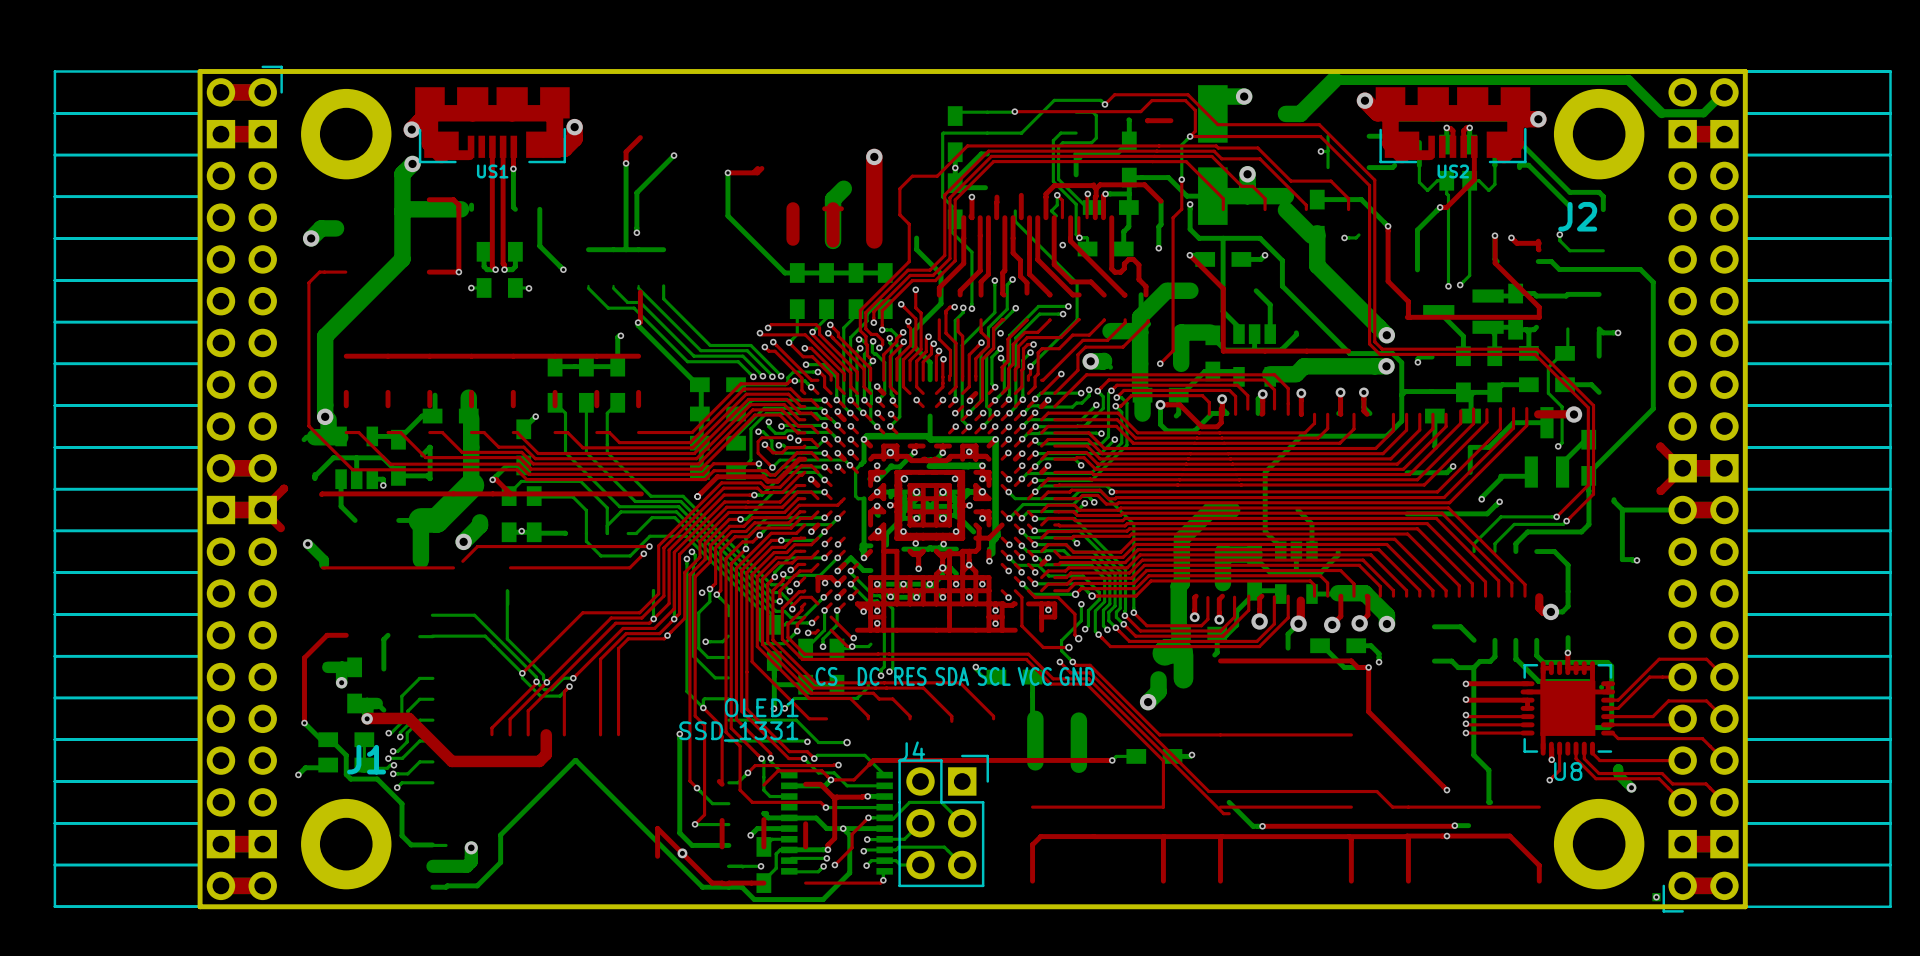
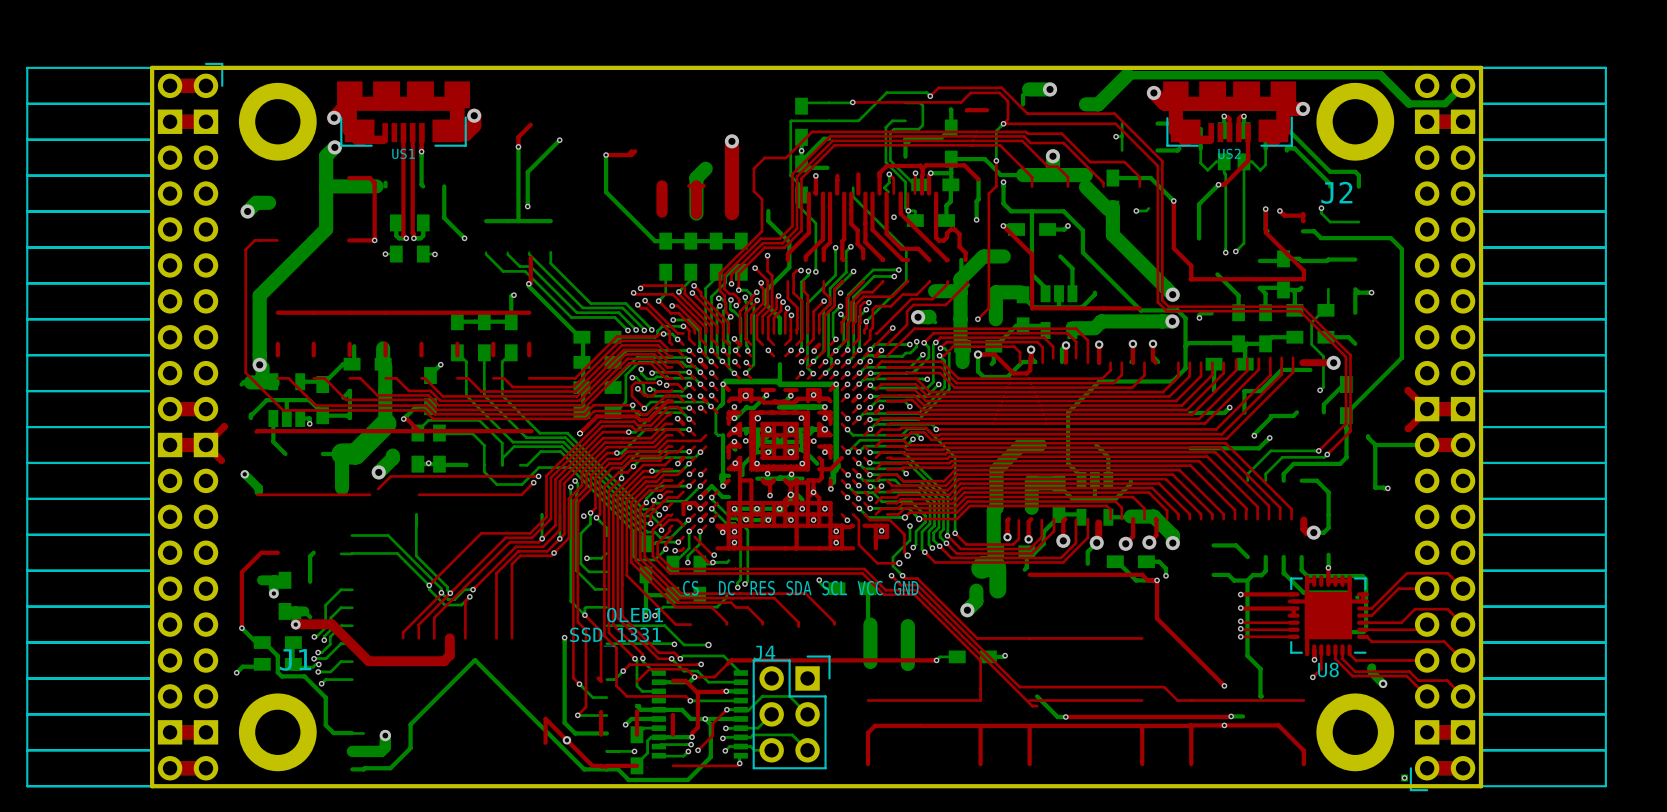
part: (1212, 155) -> none
part: (1463, 311) -> none
part: (1546, 447) -> none

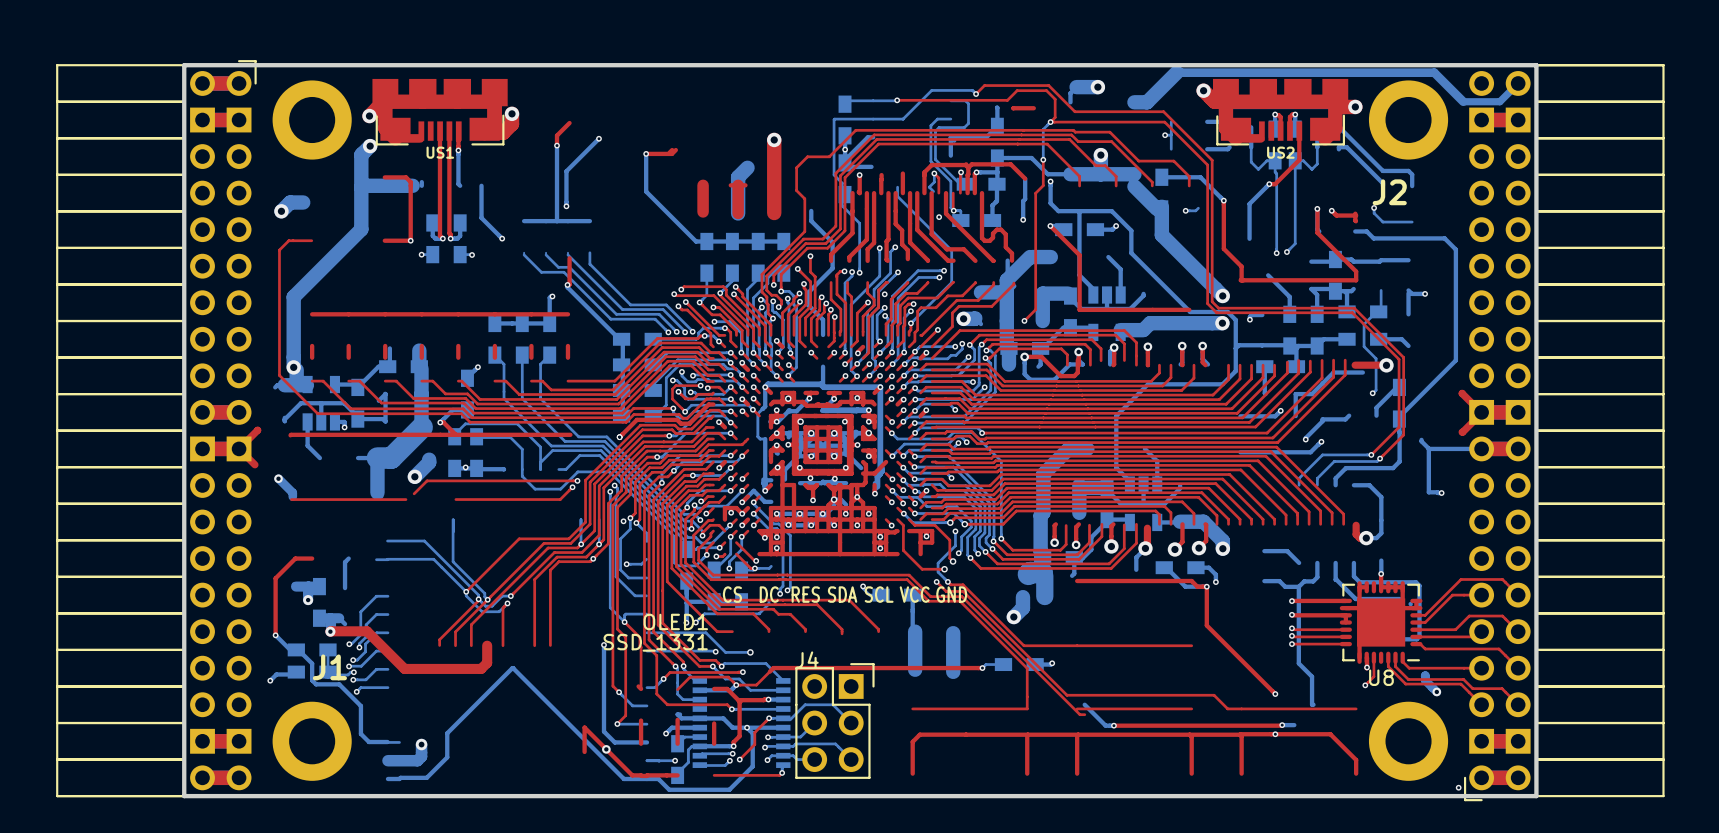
part: (1404, 777) -> none

